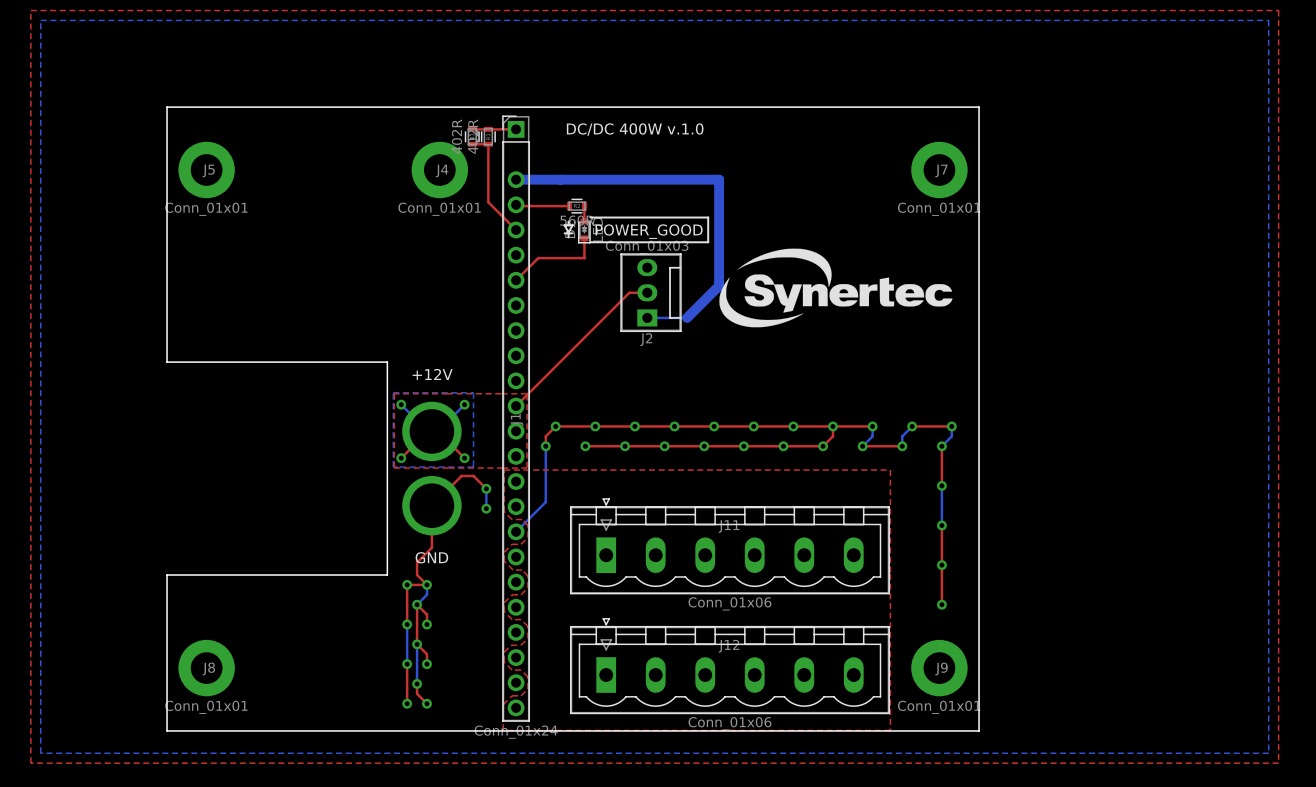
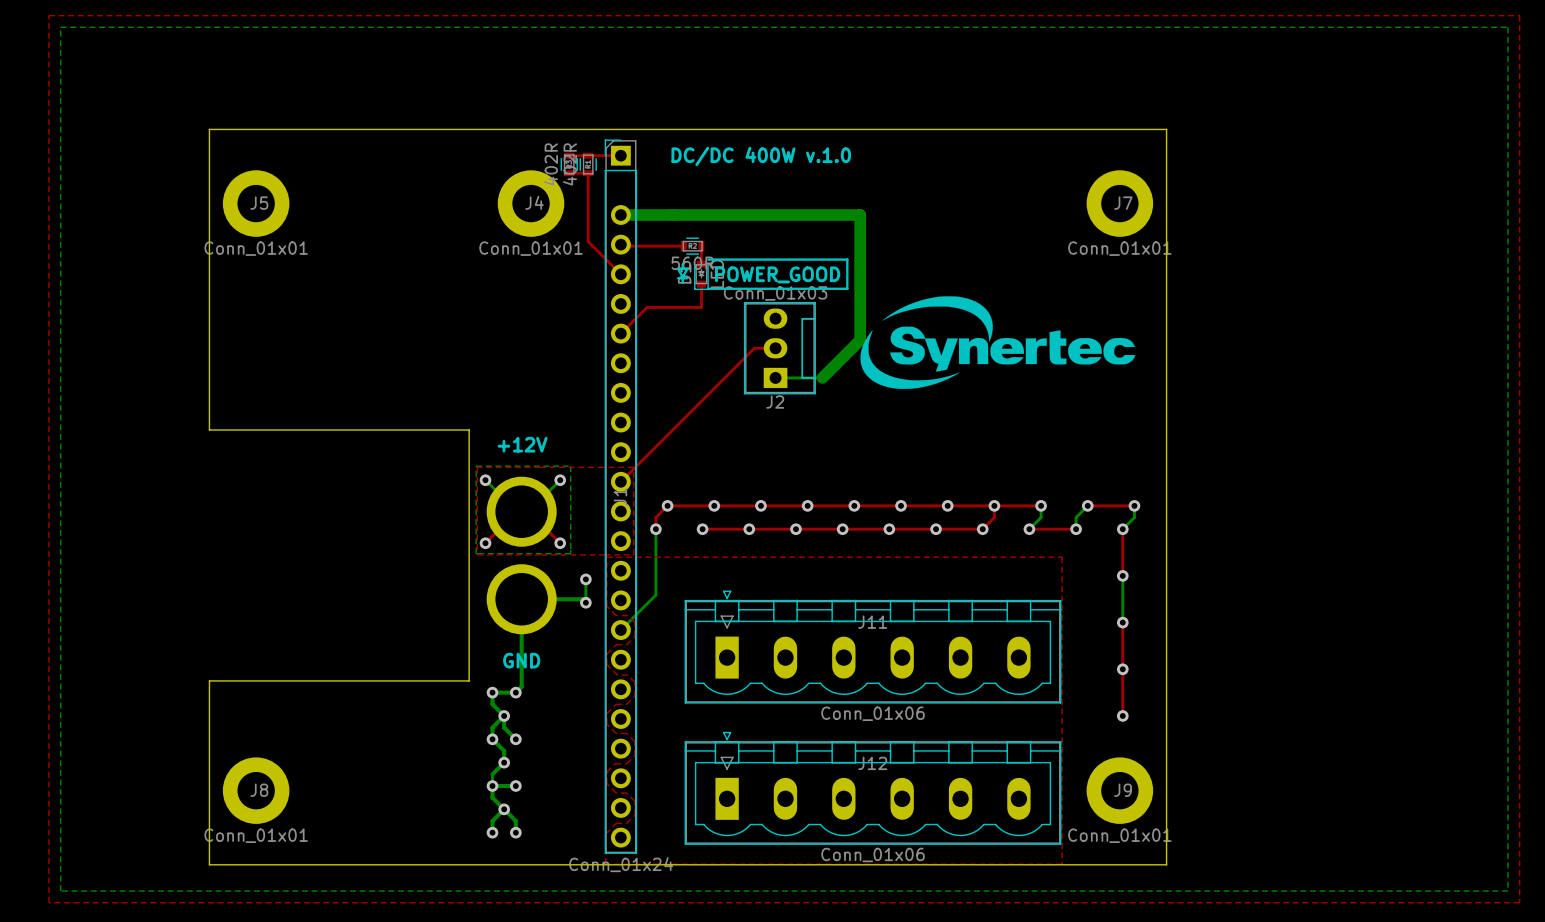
top track: (486, 488) (473, 475) (461, 475) (431, 505) (431, 547) (417, 562) (417, 575) (426, 584) (407, 584) (407, 624) -> none
bottom track: none -> (585, 602) (582, 599) (521, 599) (521, 686) (515, 692) (492, 692) (492, 704) (504, 715)
bottom track: (426, 584) (426, 594) (417, 604) -> (515, 739) (504, 727) (504, 715)
bottom track: (407, 624) (407, 654) -> (504, 715) (492, 727) (492, 739) (504, 750) (504, 762) (492, 774)
top track: (426, 624) (426, 614) (417, 604) (417, 644) (426, 654) (426, 664) -> none
bottom track: (417, 644) (417, 683) -> (492, 832) (492, 821) (504, 809)
top track: (407, 664) (407, 703) -> none
bottom track: none -> (515, 786) (492, 786) (492, 797) (515, 821) (515, 832)
top track: (417, 683) (417, 693) (426, 703) -> none

